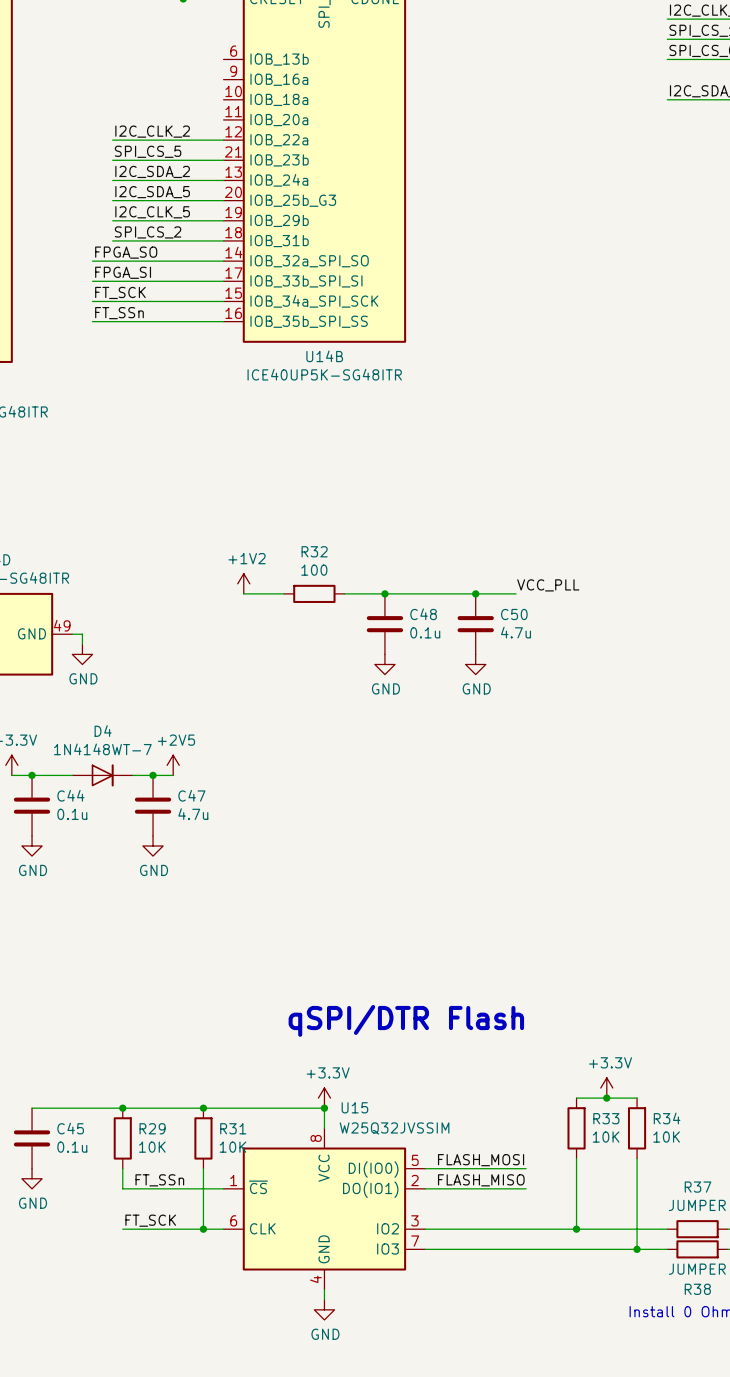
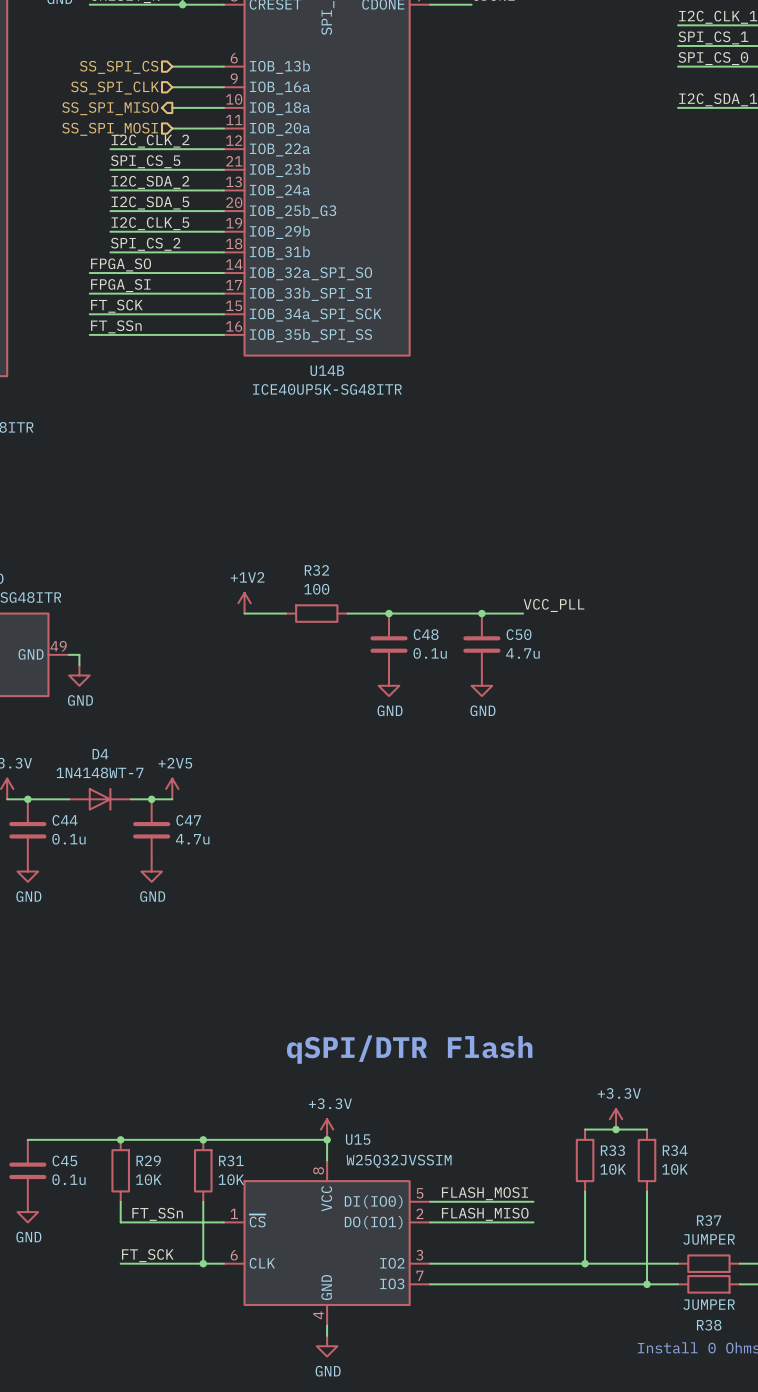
hierarchical label: none -> SS_SPI_CS (119, 67)
wire: none -> (172, 66) (223, 66)
hierarchical label: none -> SS_SPI_CLK (115, 88)
wire: none -> (172, 87) (223, 87)
hierarchical label: none -> SS_SPI_MISO (110, 108)
wire: none -> (172, 107) (223, 107)
wire: none -> (172, 128) (223, 128)
hierarchical label: none -> SS_SPI_MOSI (110, 129)

